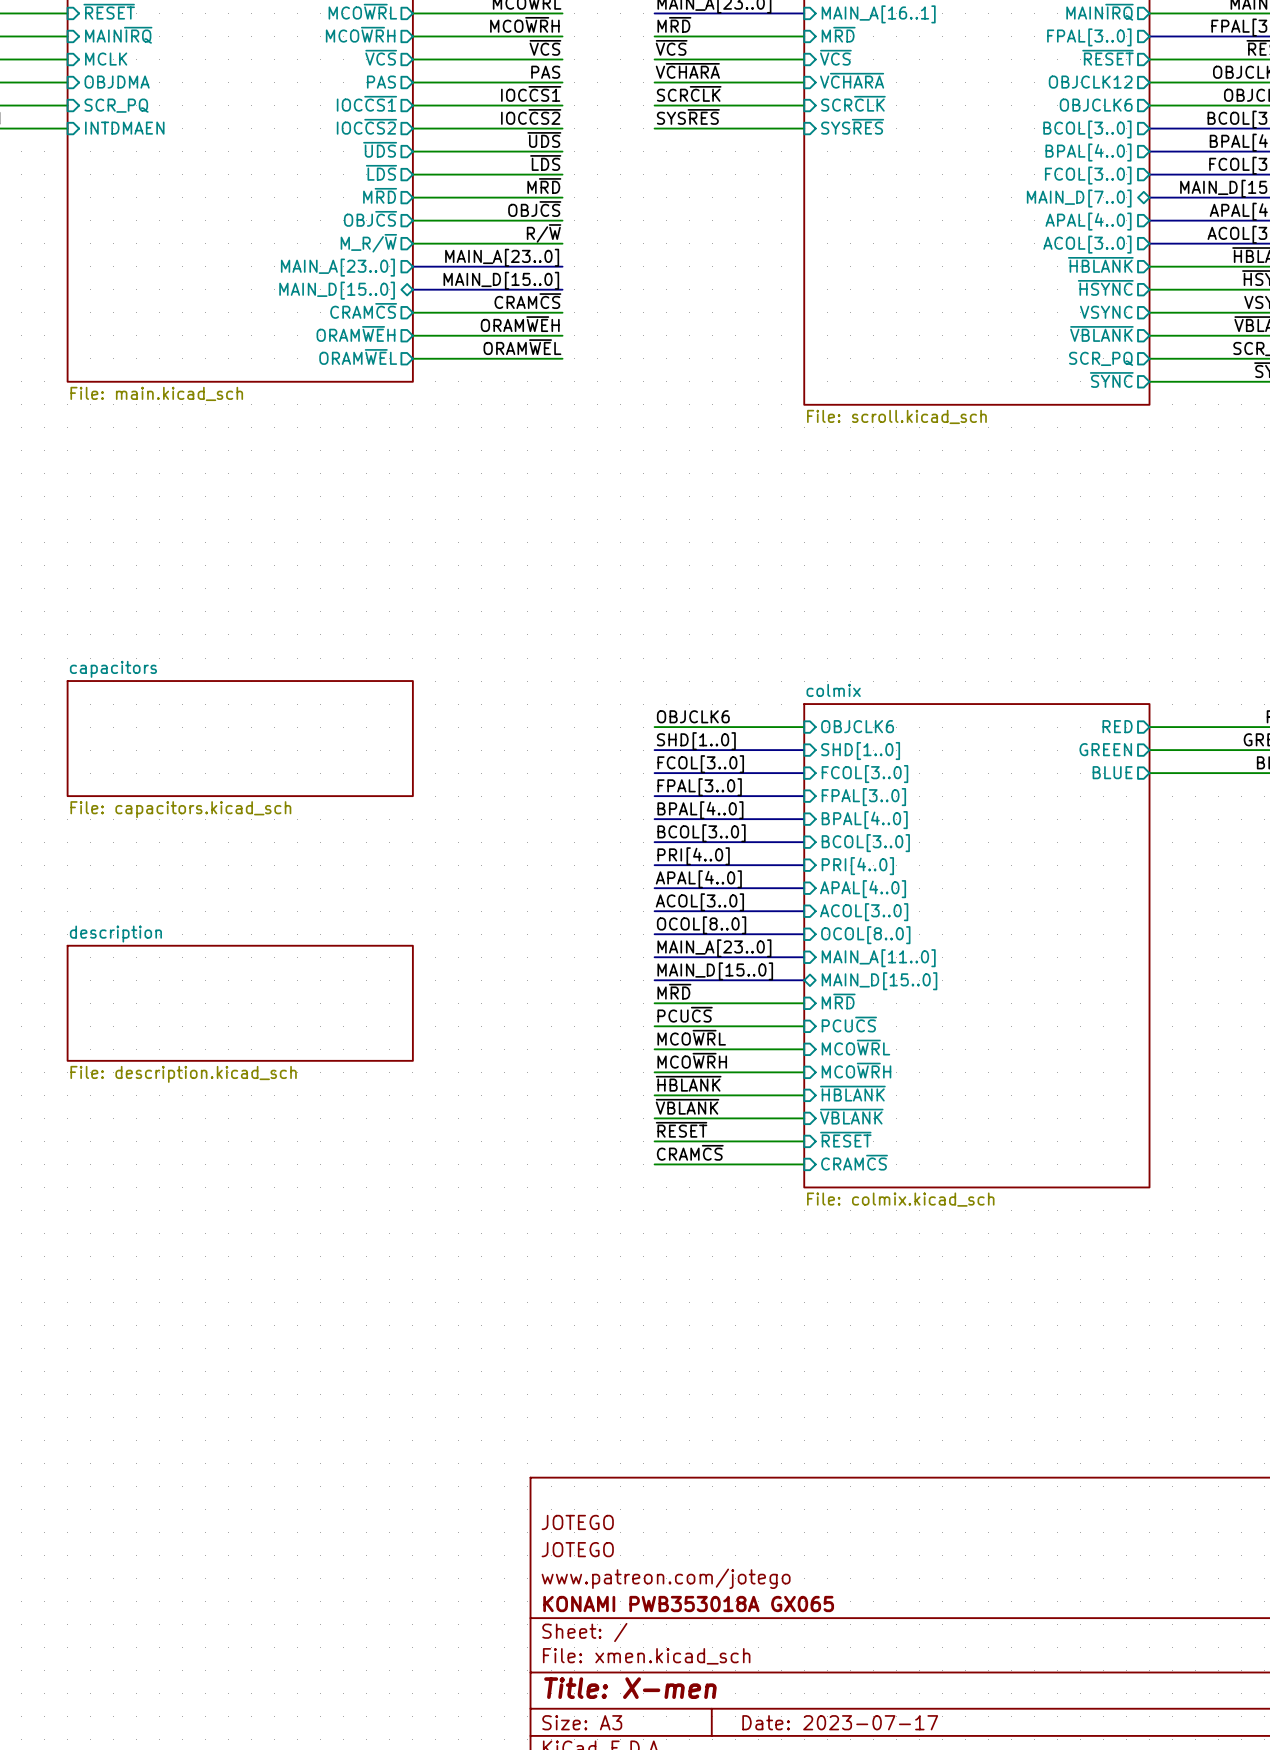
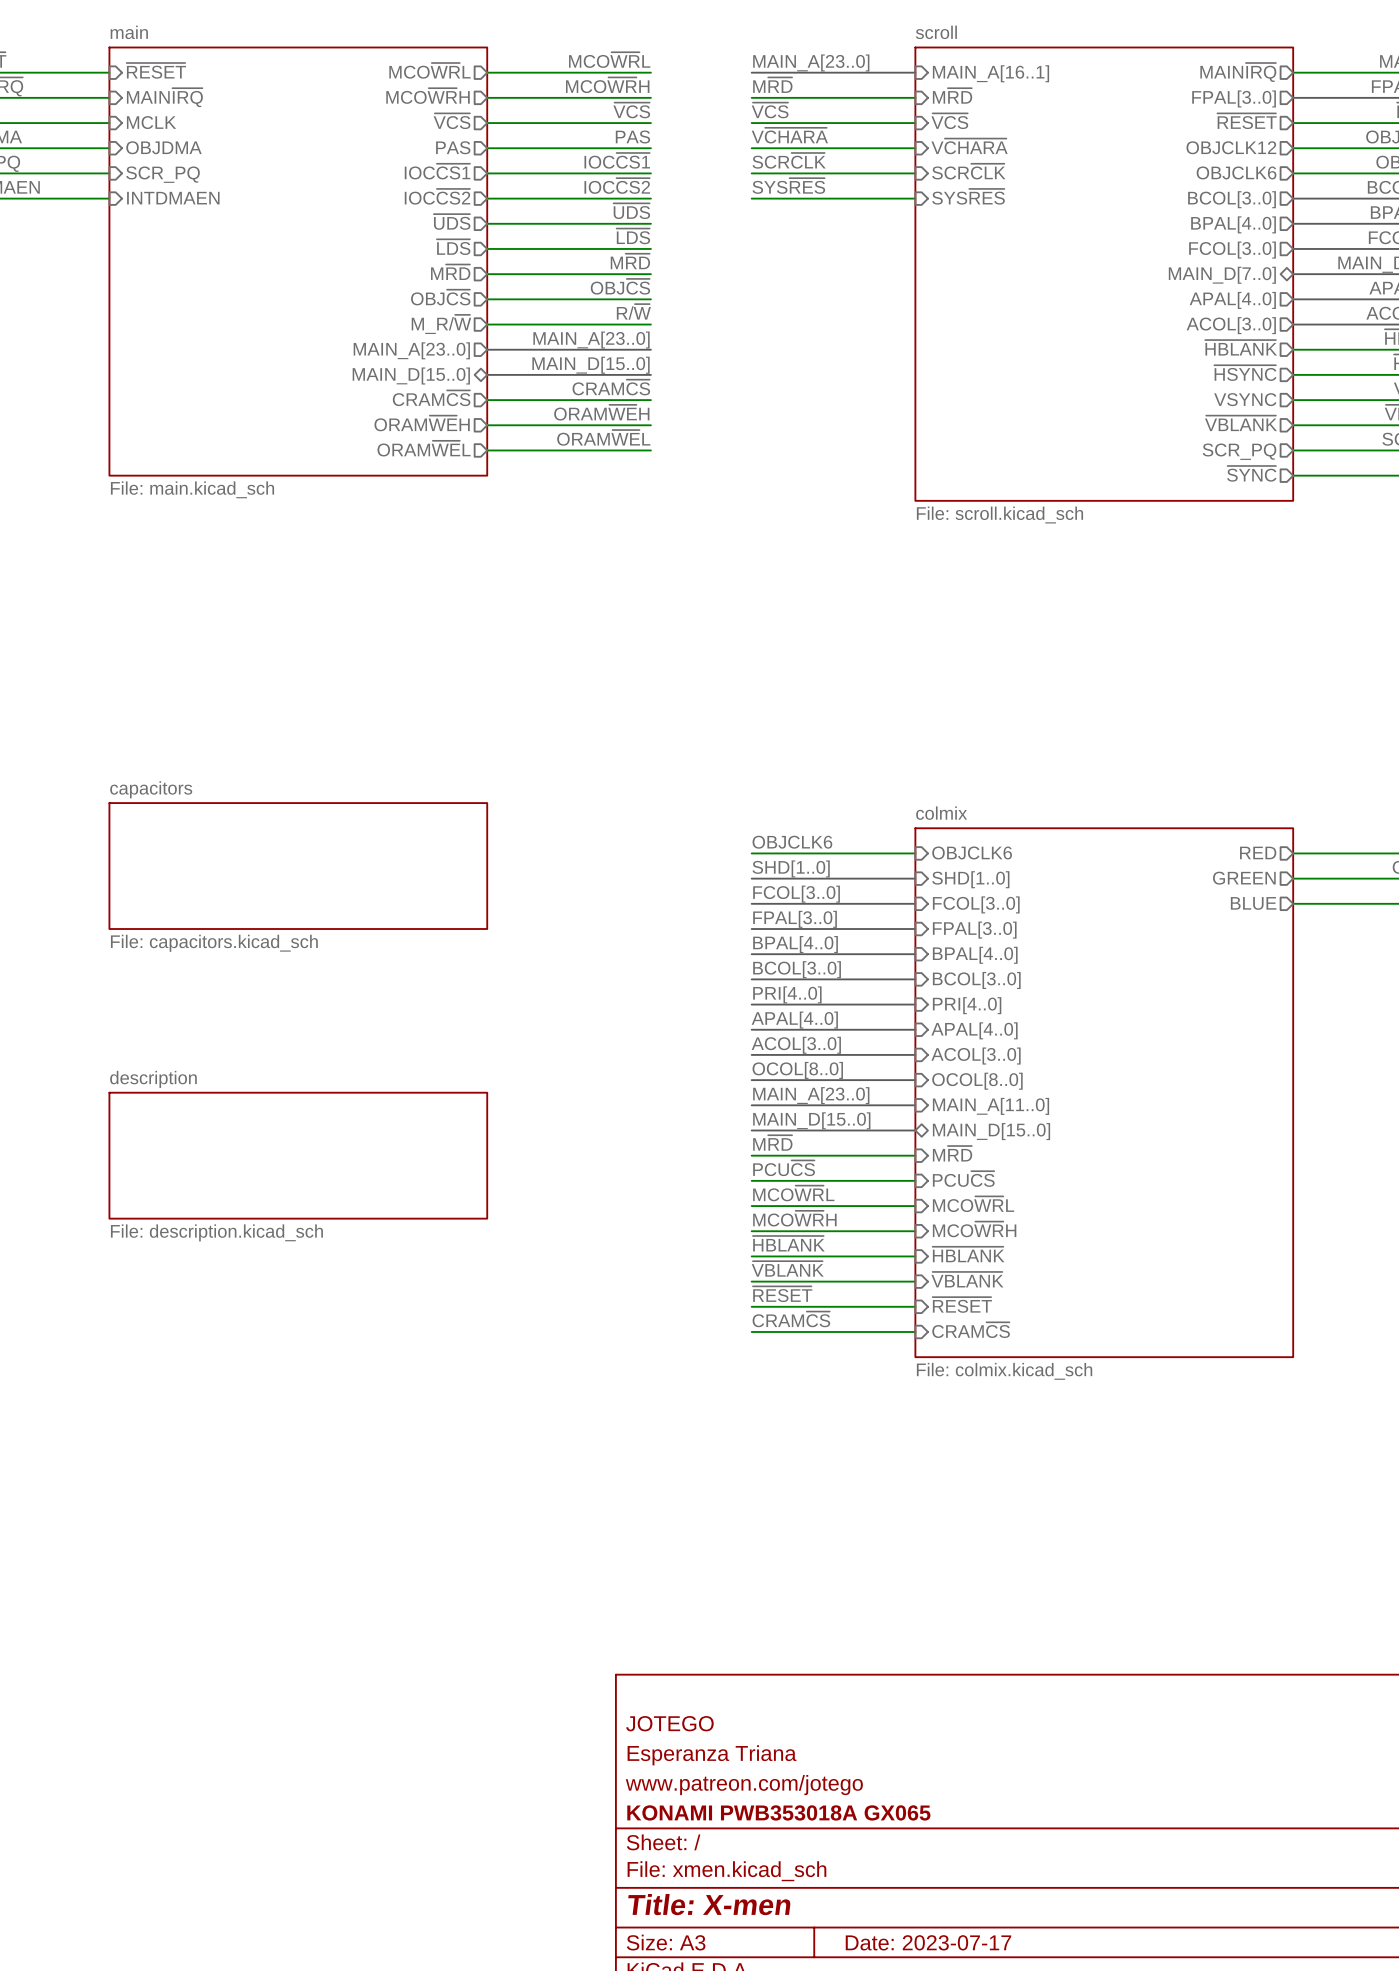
title block: JOTEGO (577, 1549) -> Esperanza Triana (712, 1755)

